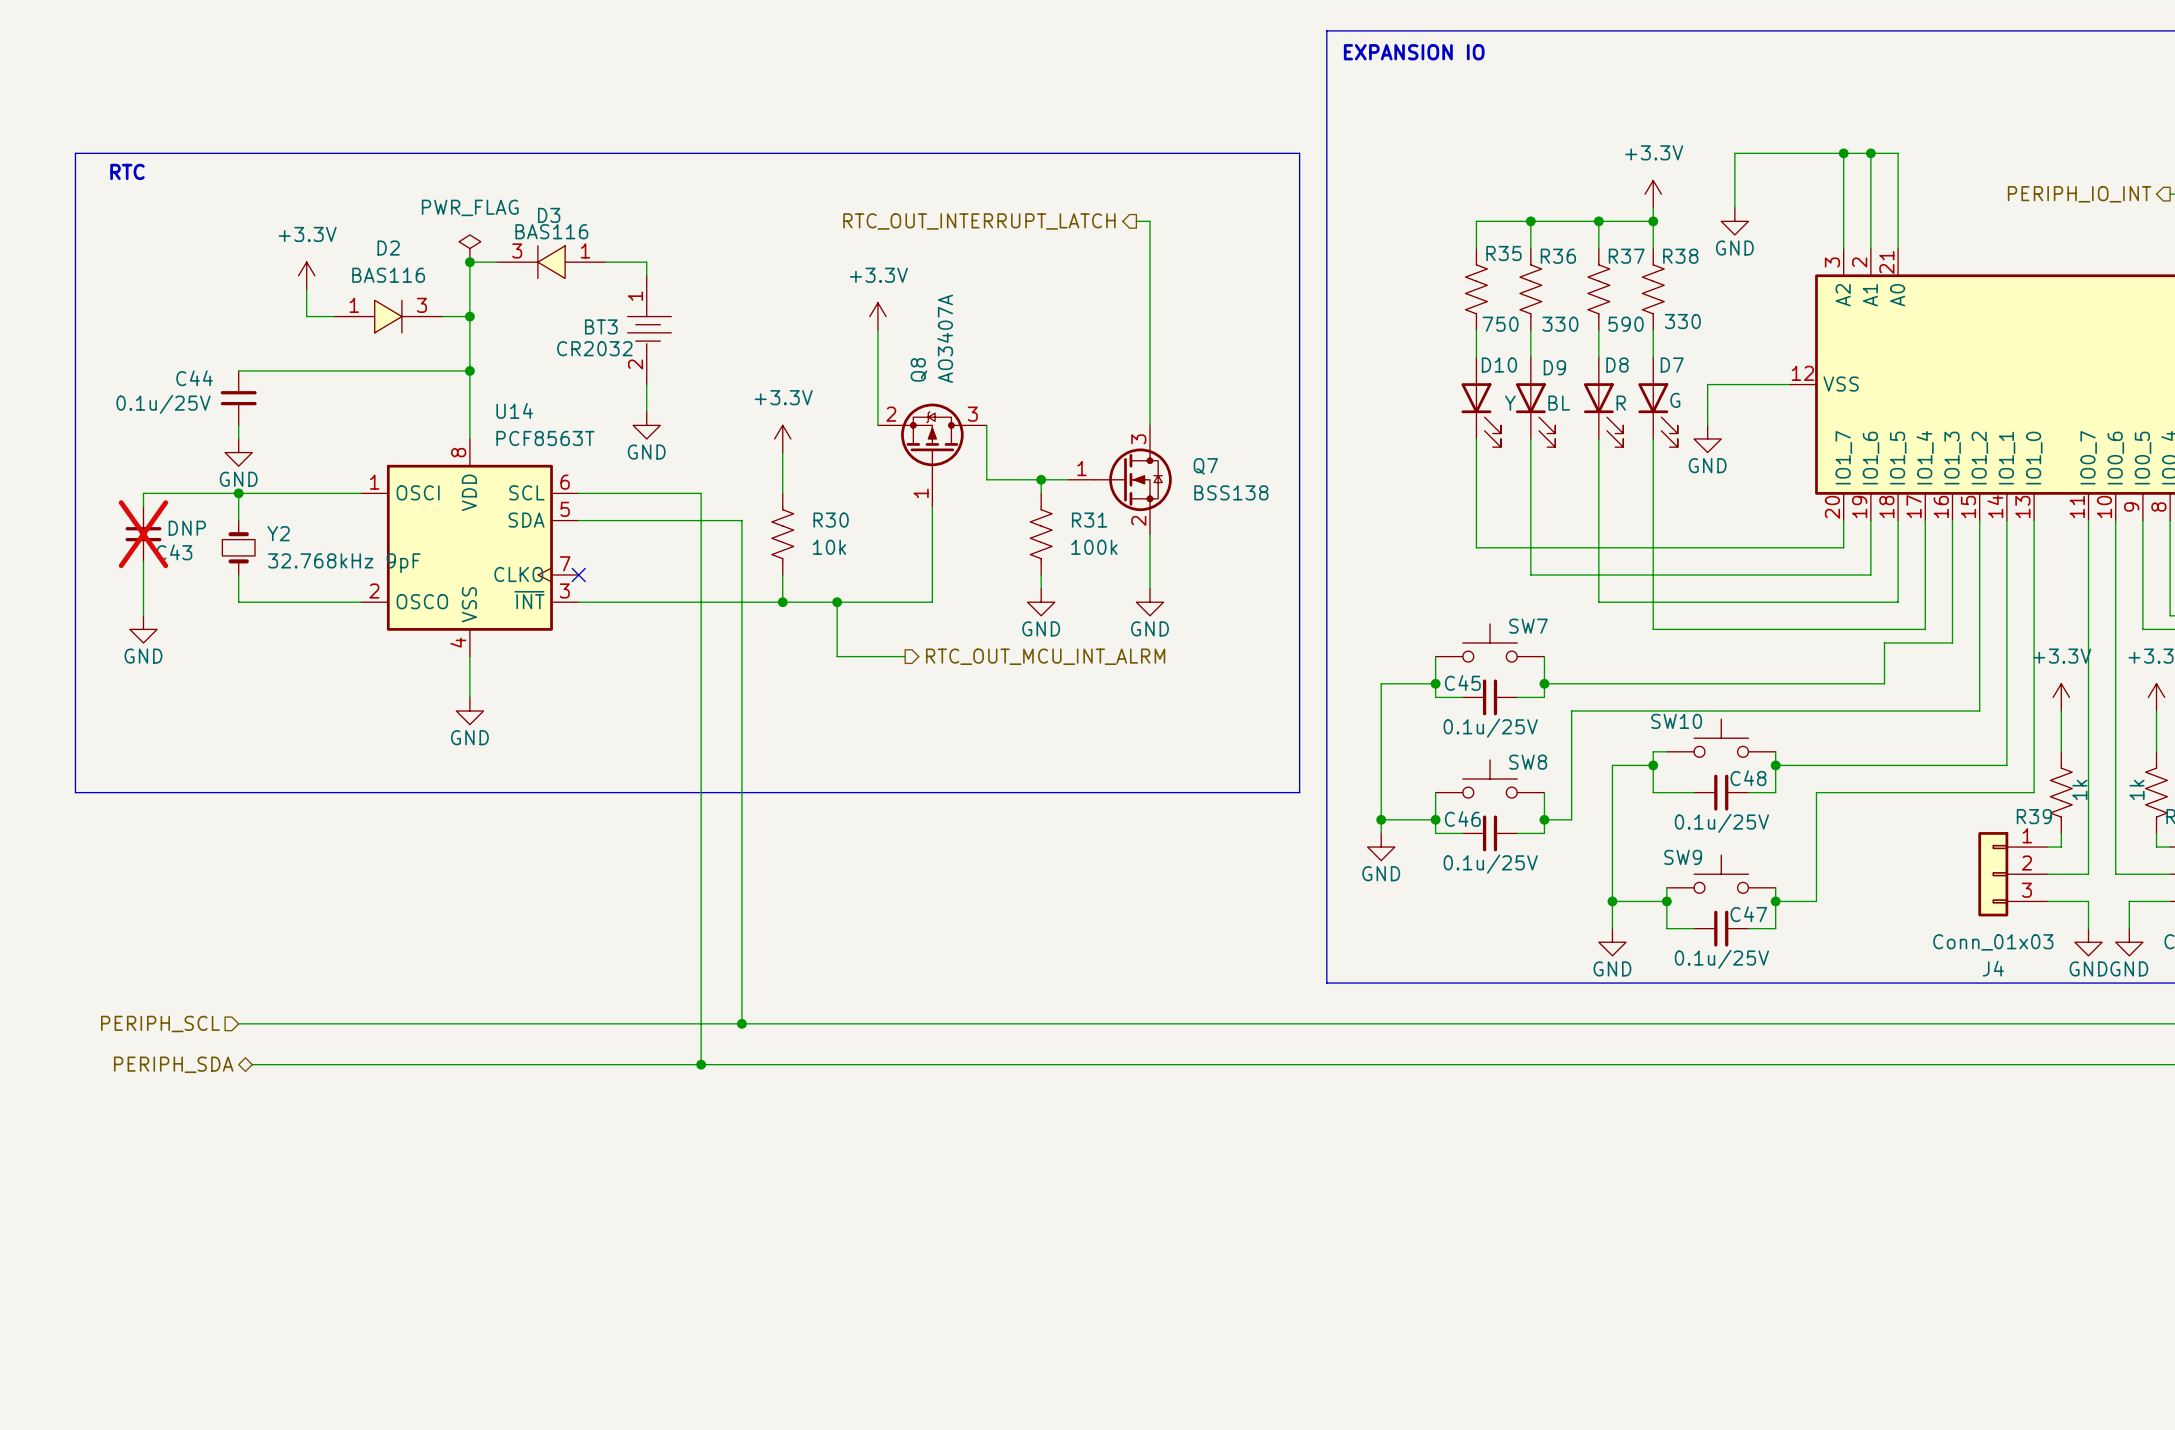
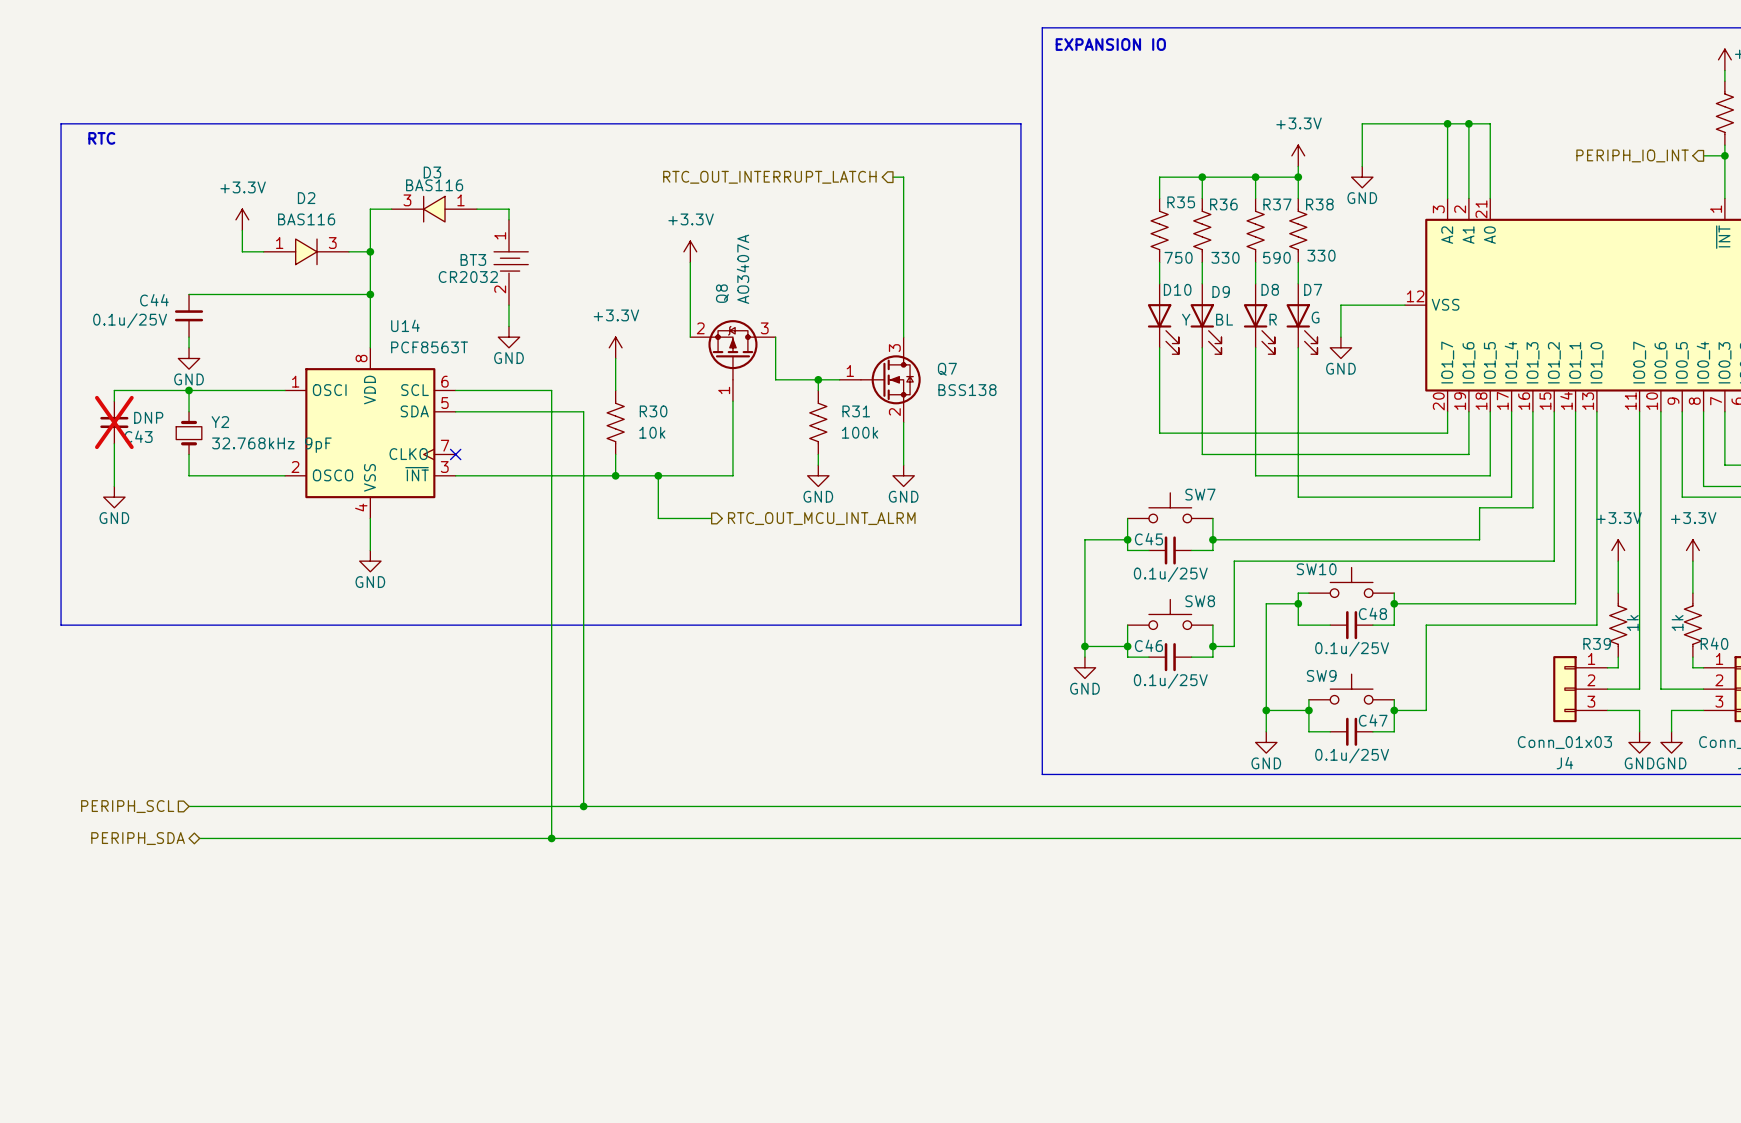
power symbol: PWR_FLAG (469, 248) -> none
junction: (469, 262) -> none

